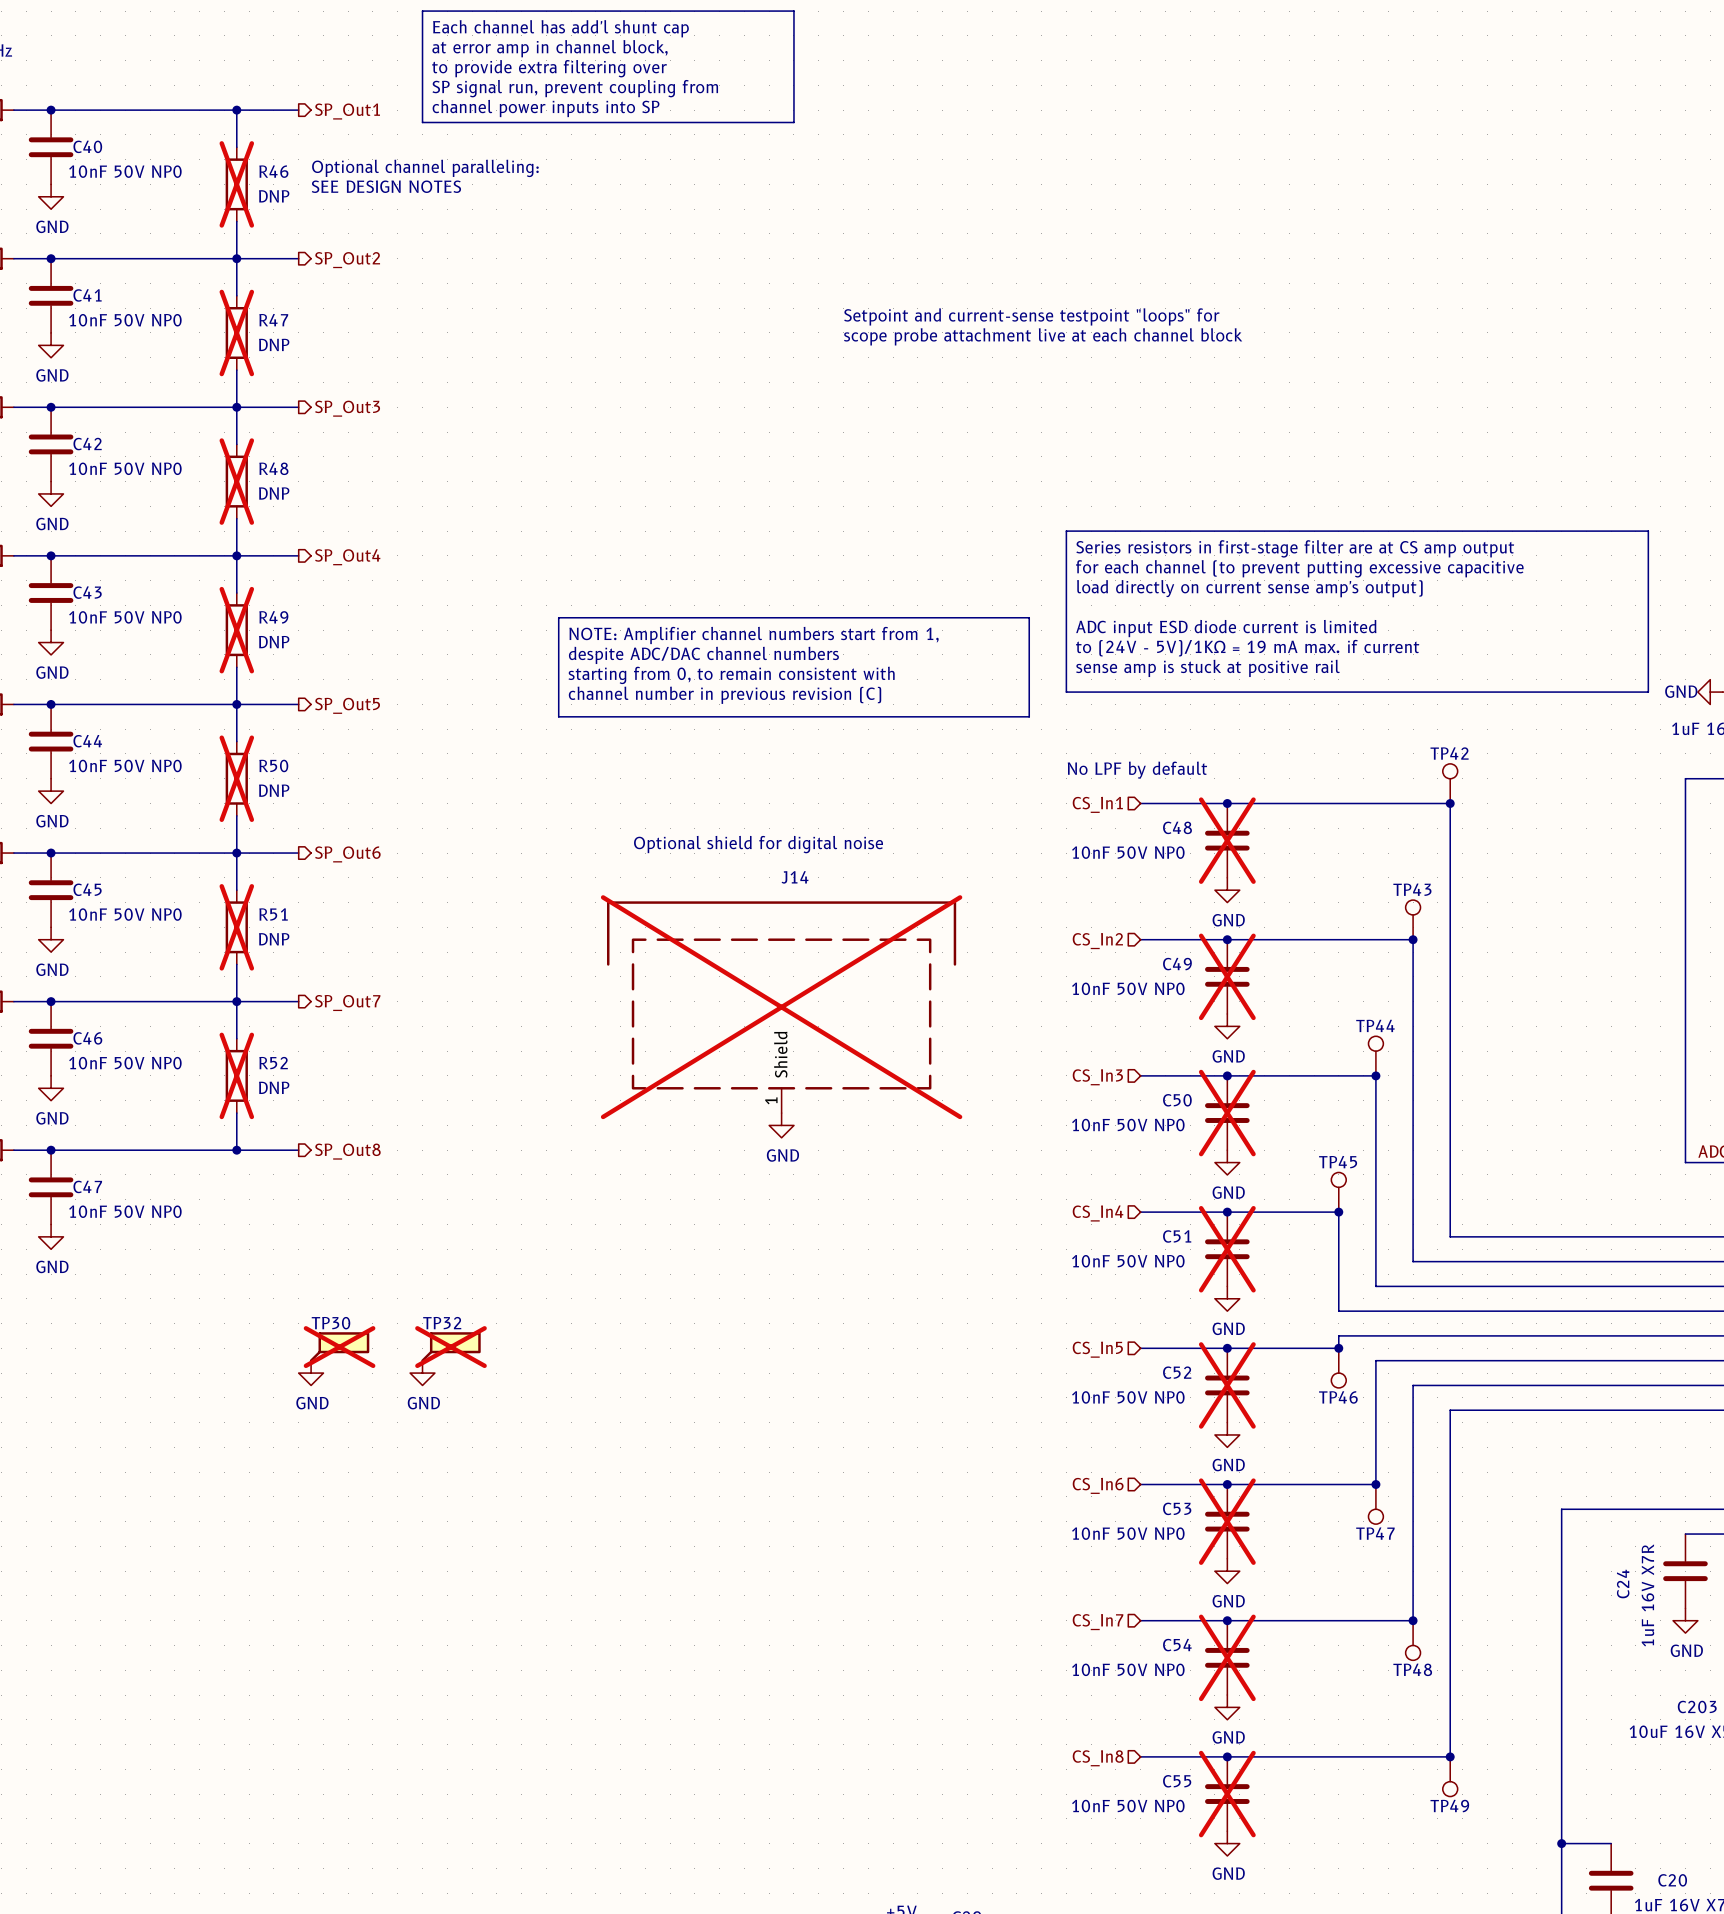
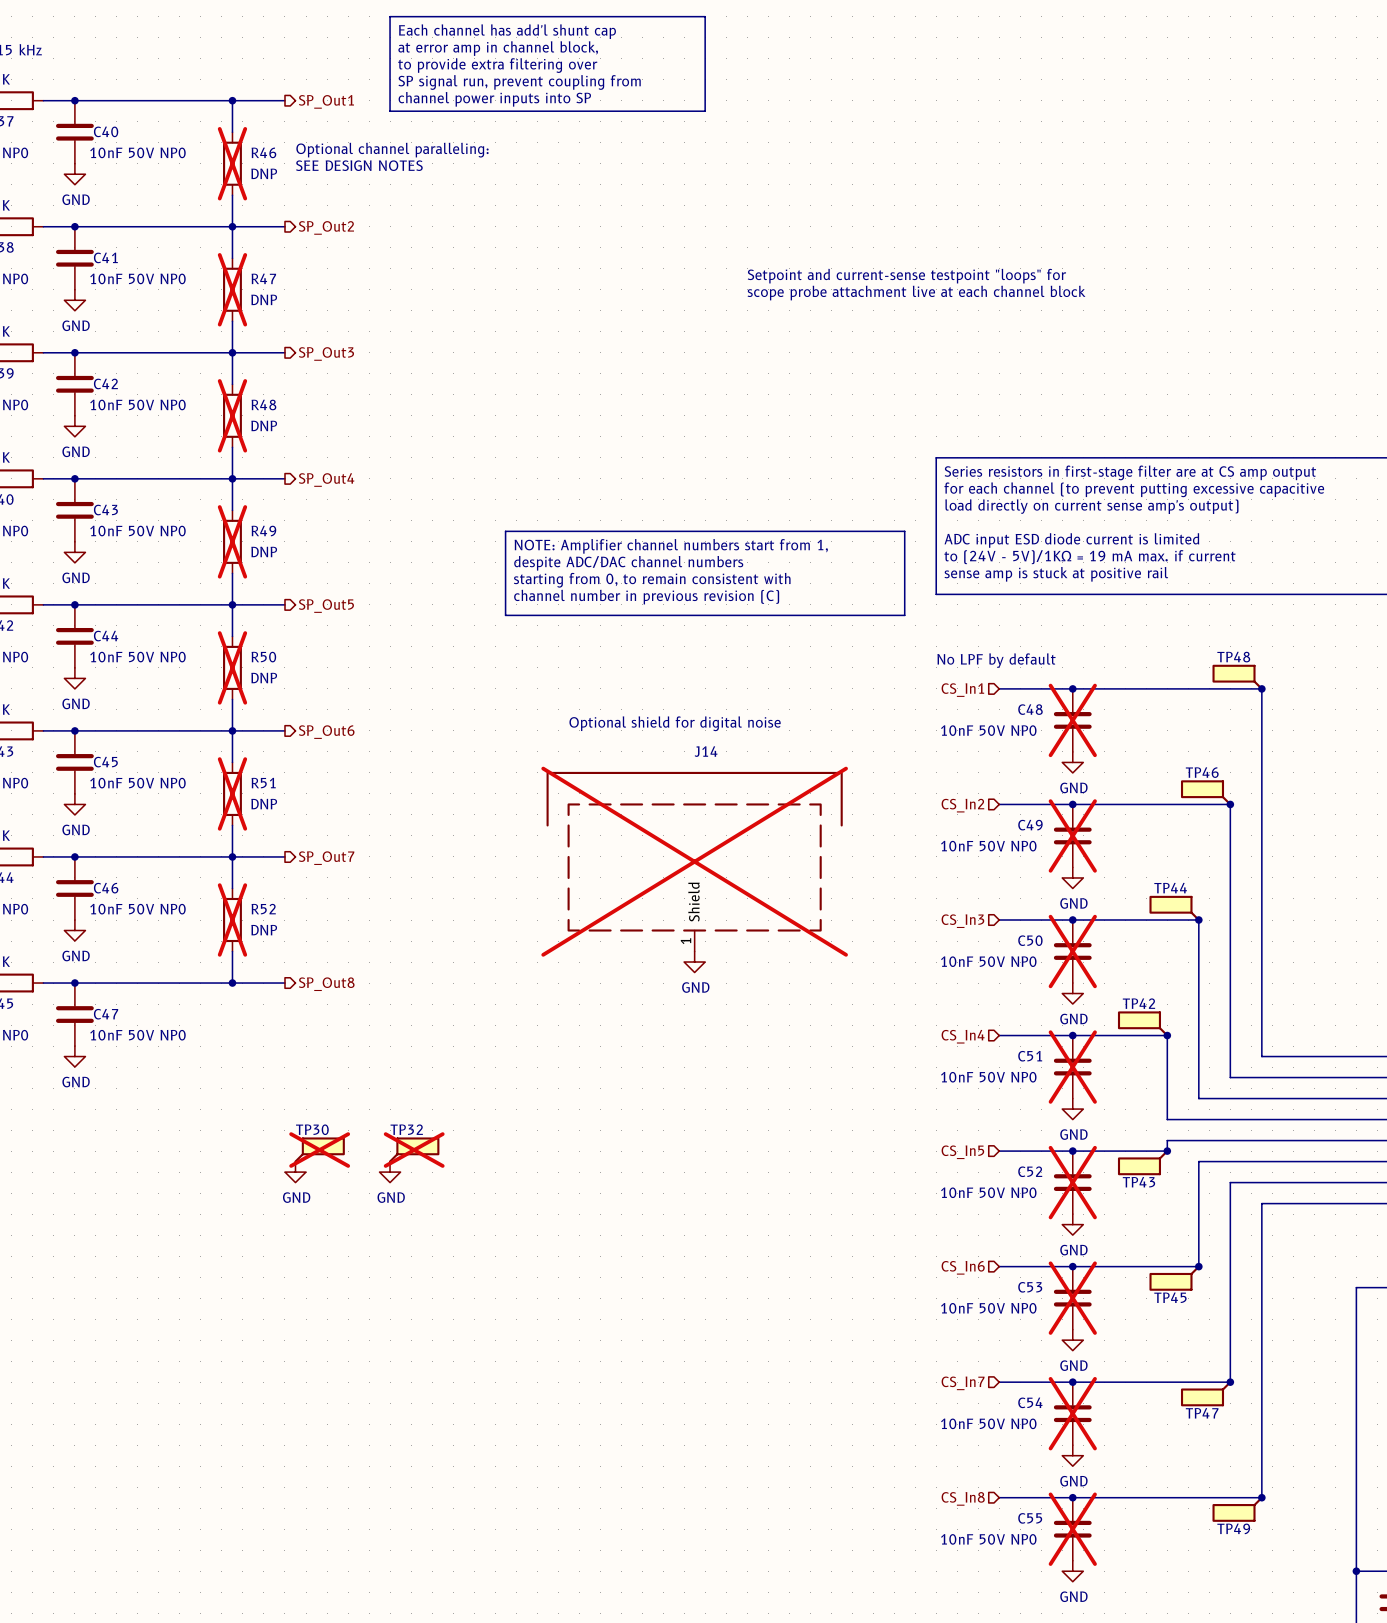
TP42 symbol: [1442, 763, 1458, 804] -> [1117, 1011, 1169, 1037]
TP43 name position: TP43 (1412, 889) -> TP43 (1138, 1182)
TP43 symbol: [1405, 900, 1421, 940] -> [1117, 1150, 1169, 1176]
TP44 symbol: [1368, 1036, 1384, 1076] -> [1149, 895, 1200, 922]
TP45 name position: TP45 (1338, 1162) -> TP45 (1170, 1297)
TP45 symbol: [1331, 1172, 1347, 1213] -> [1149, 1265, 1200, 1291]
TP46 symbol: [1331, 1348, 1347, 1388] -> [1180, 780, 1232, 806]
TP46 name position: TP46 (1338, 1397) -> TP46 (1202, 772)
TP47 symbol: [1368, 1484, 1384, 1525] -> [1180, 1381, 1232, 1407]
TP48 symbol: [1405, 1620, 1421, 1661] -> [1212, 664, 1263, 690]
TP48 name position: TP48 (1412, 1669) -> TP48 (1233, 657)
TP49 symbol: [1442, 1756, 1458, 1797] -> [1212, 1496, 1263, 1522]

